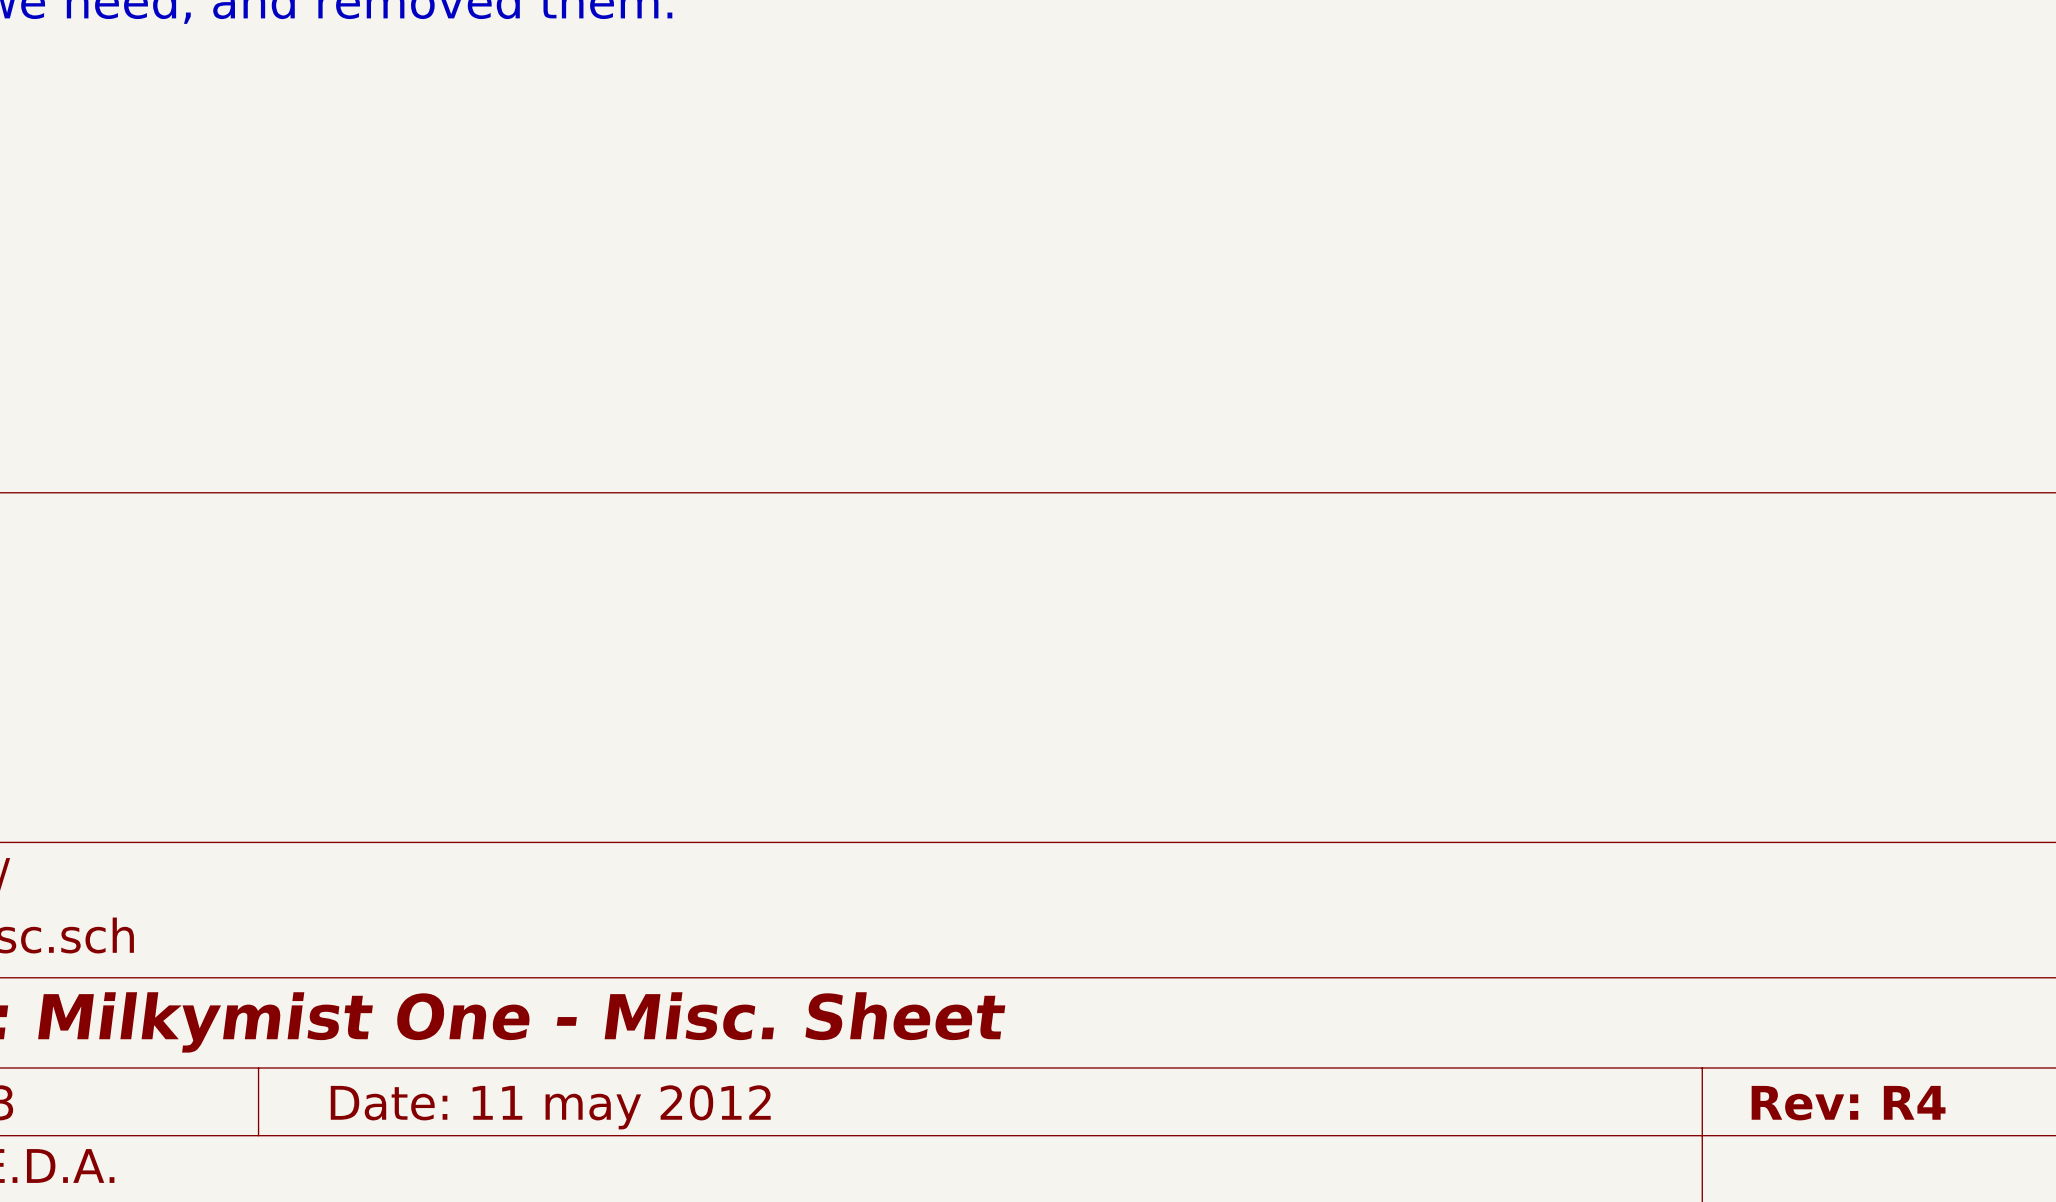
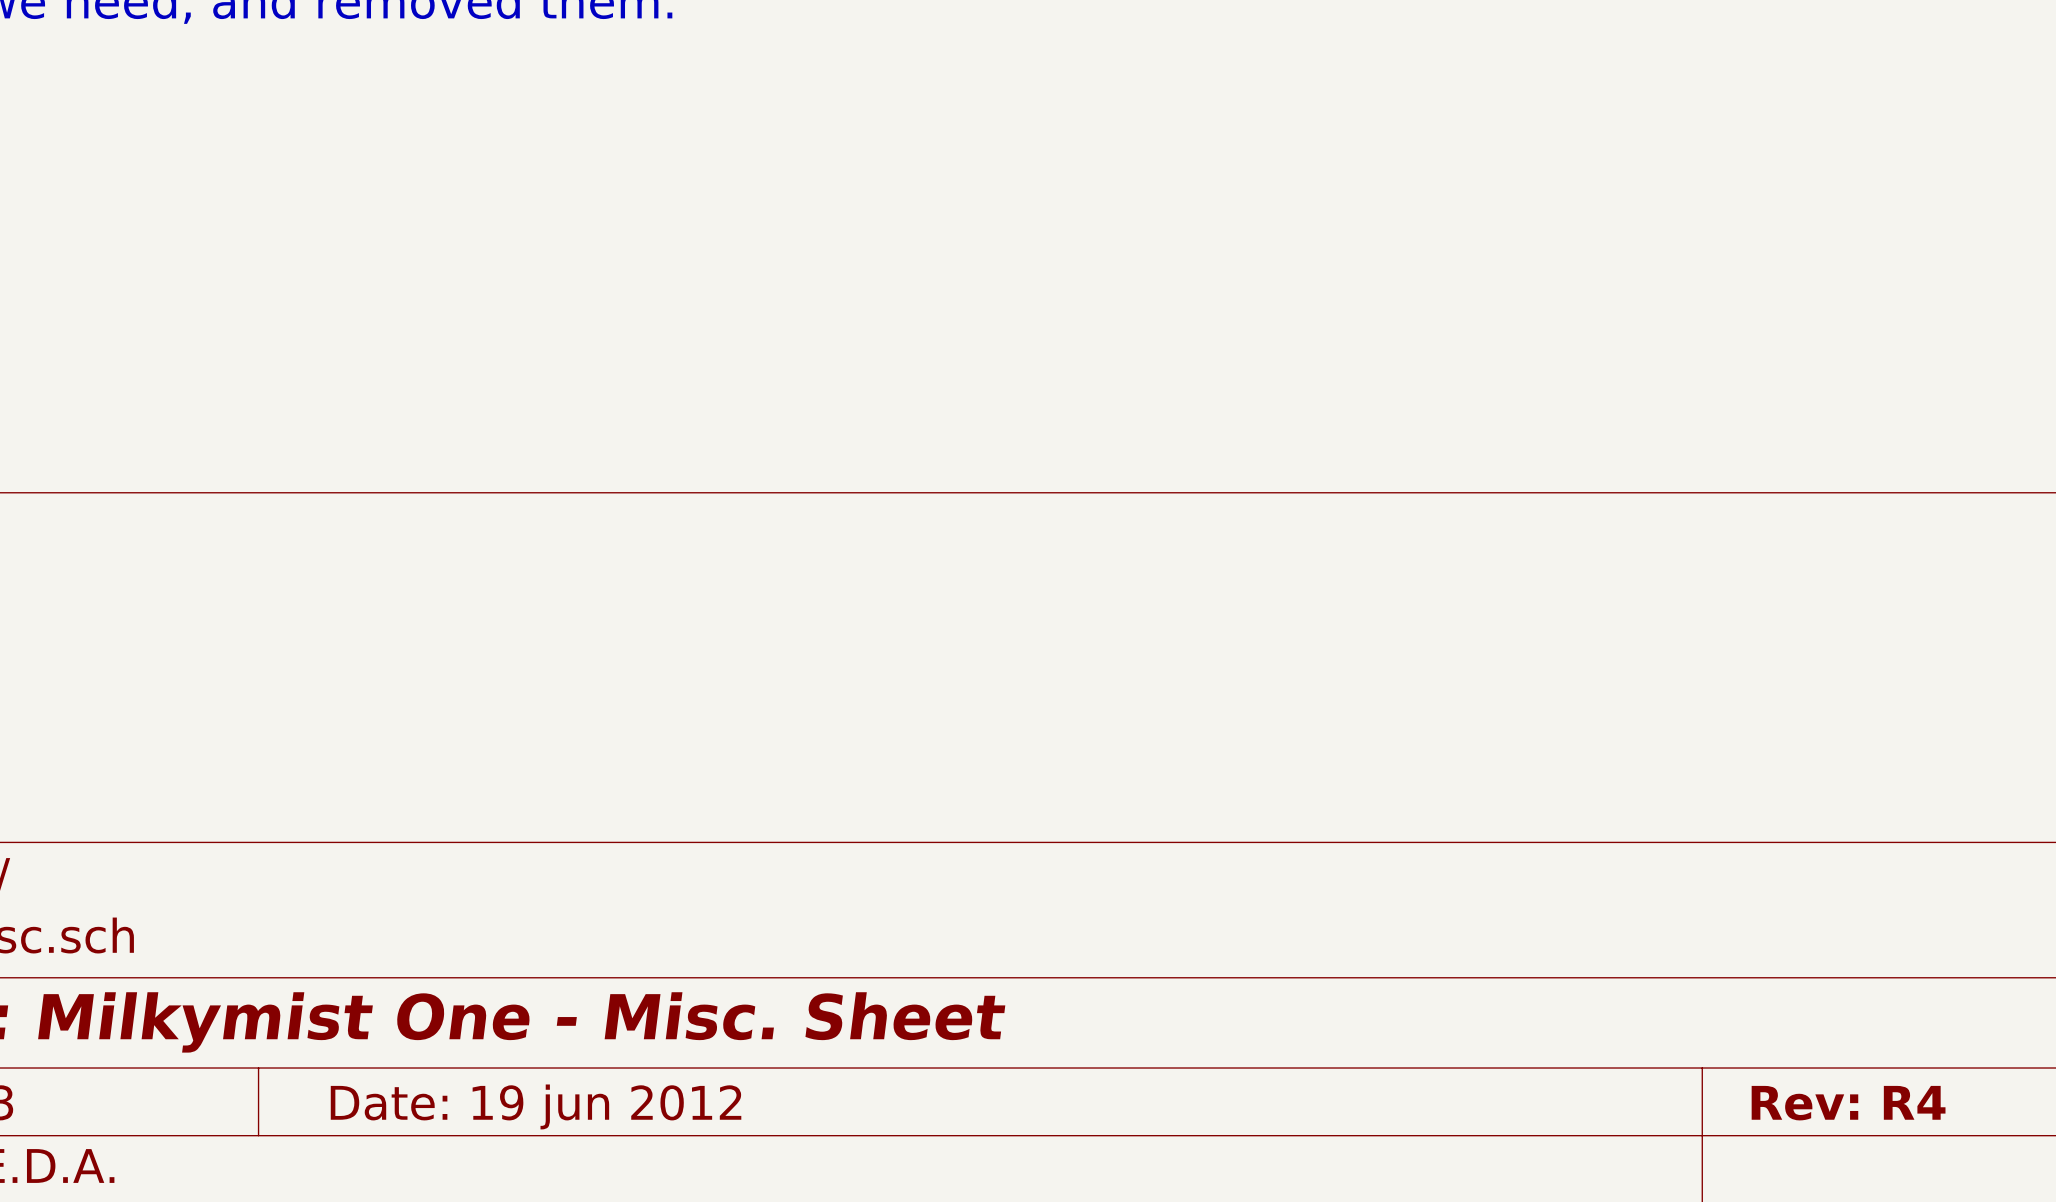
title block: Date: 11 may 2012 (550, 1107) -> Date: 19 jun 2012 (536, 1106)

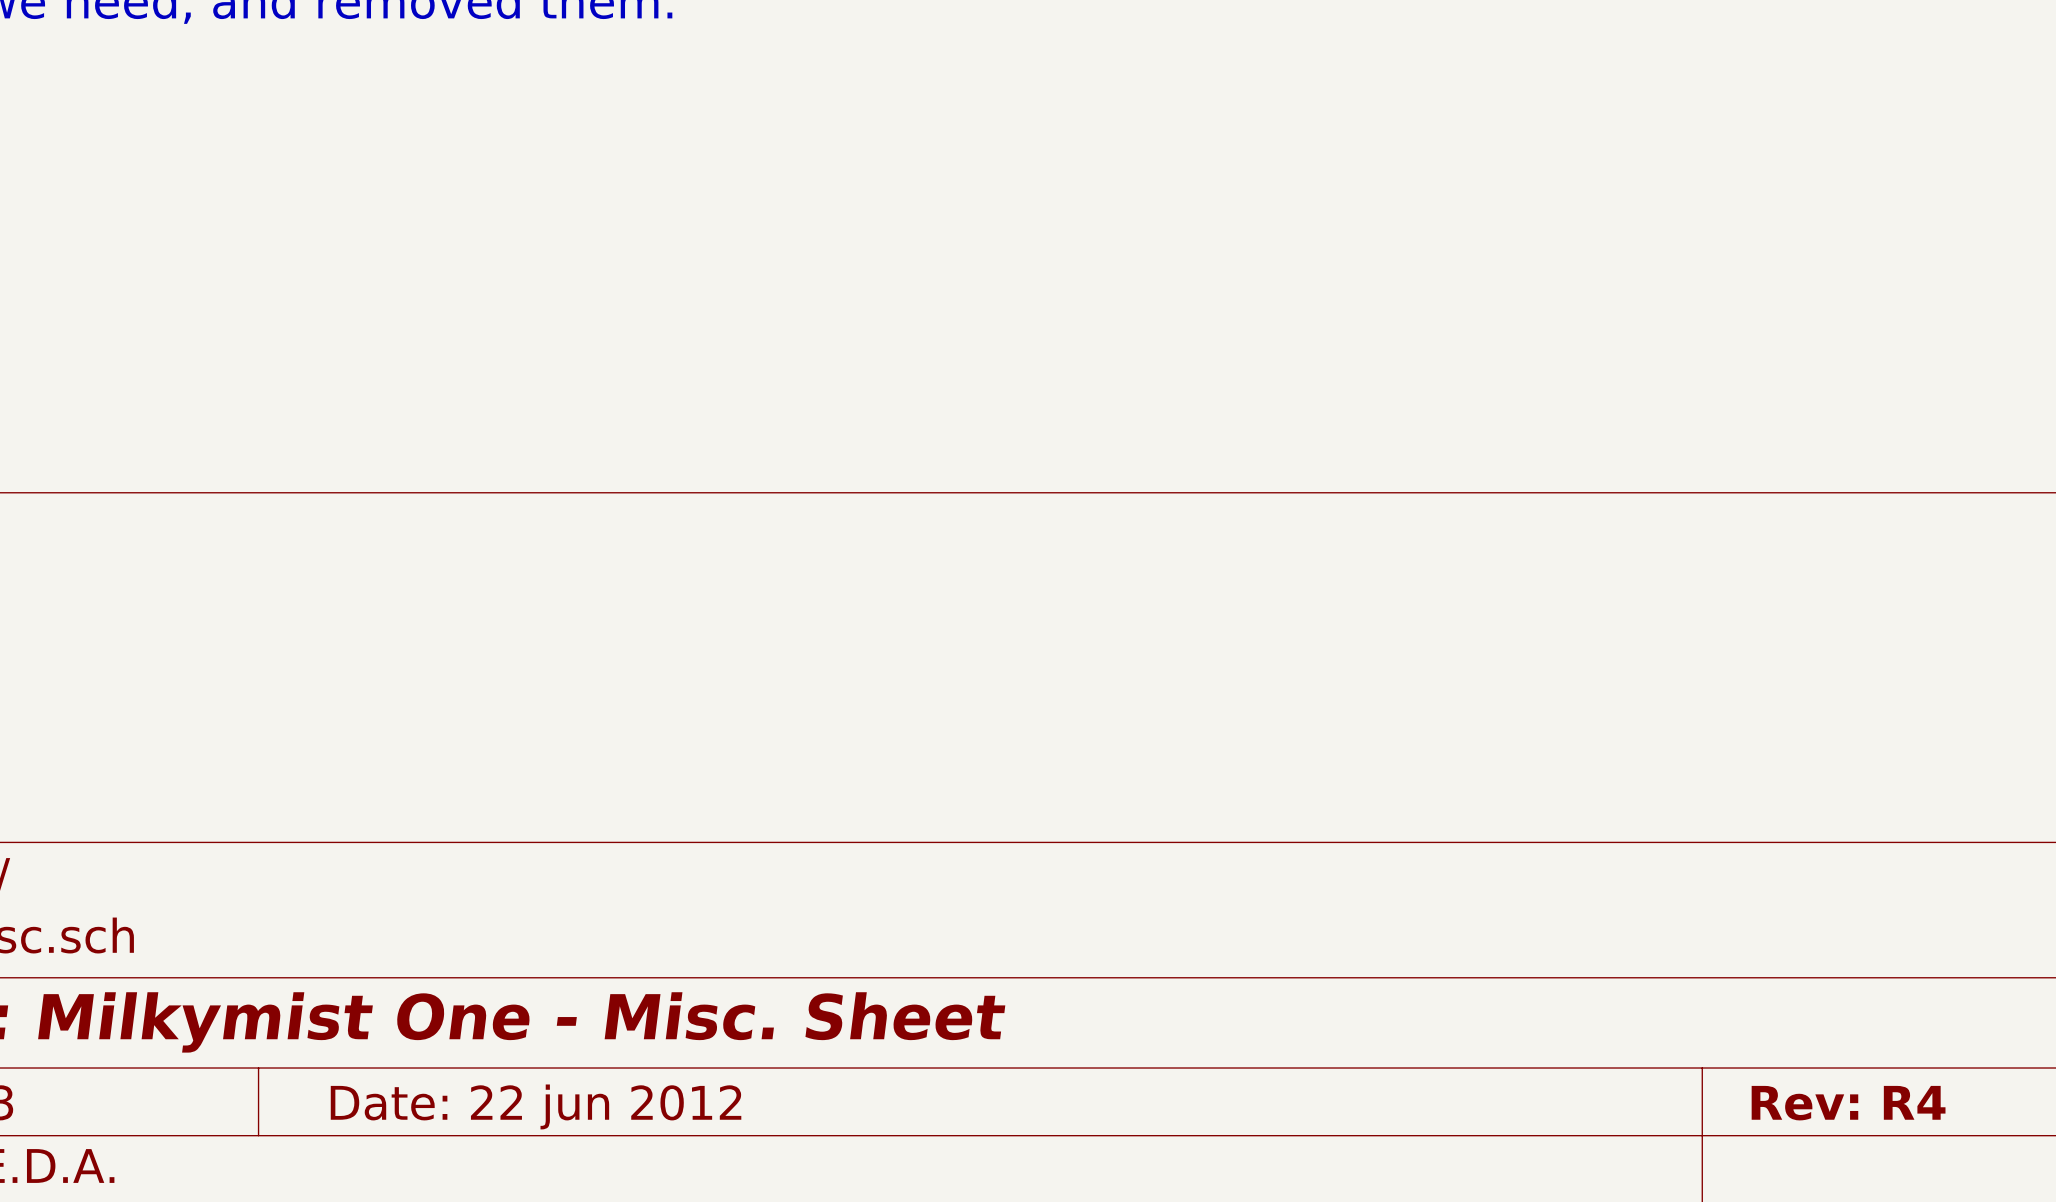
title block: Date: 19 jun 2012 (536, 1106) -> Date: 22 jun 2012 (536, 1106)

